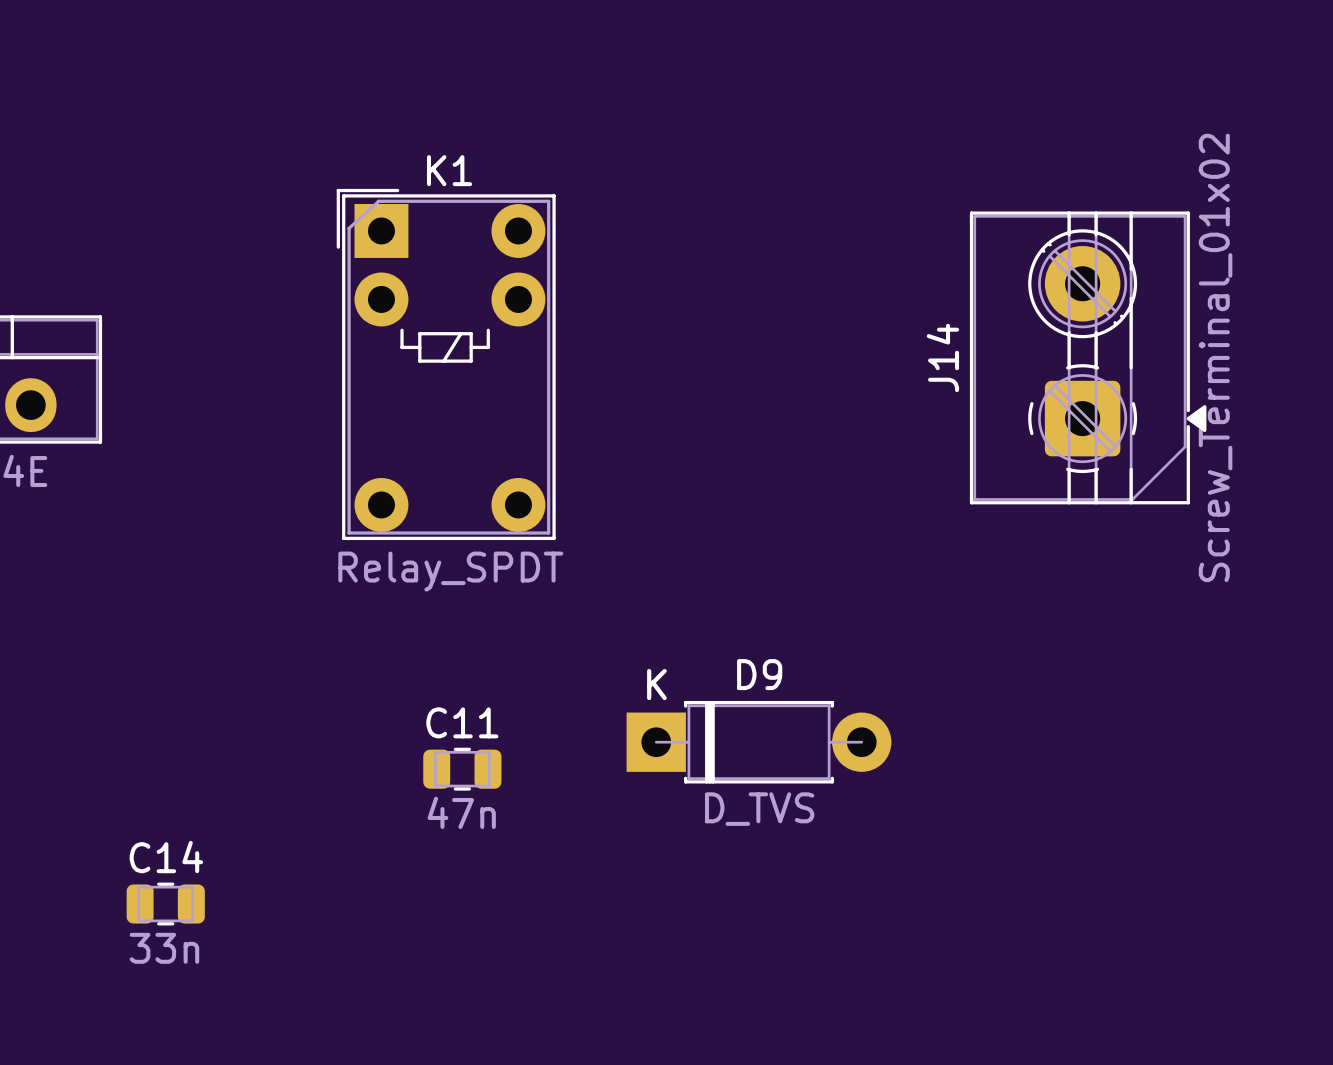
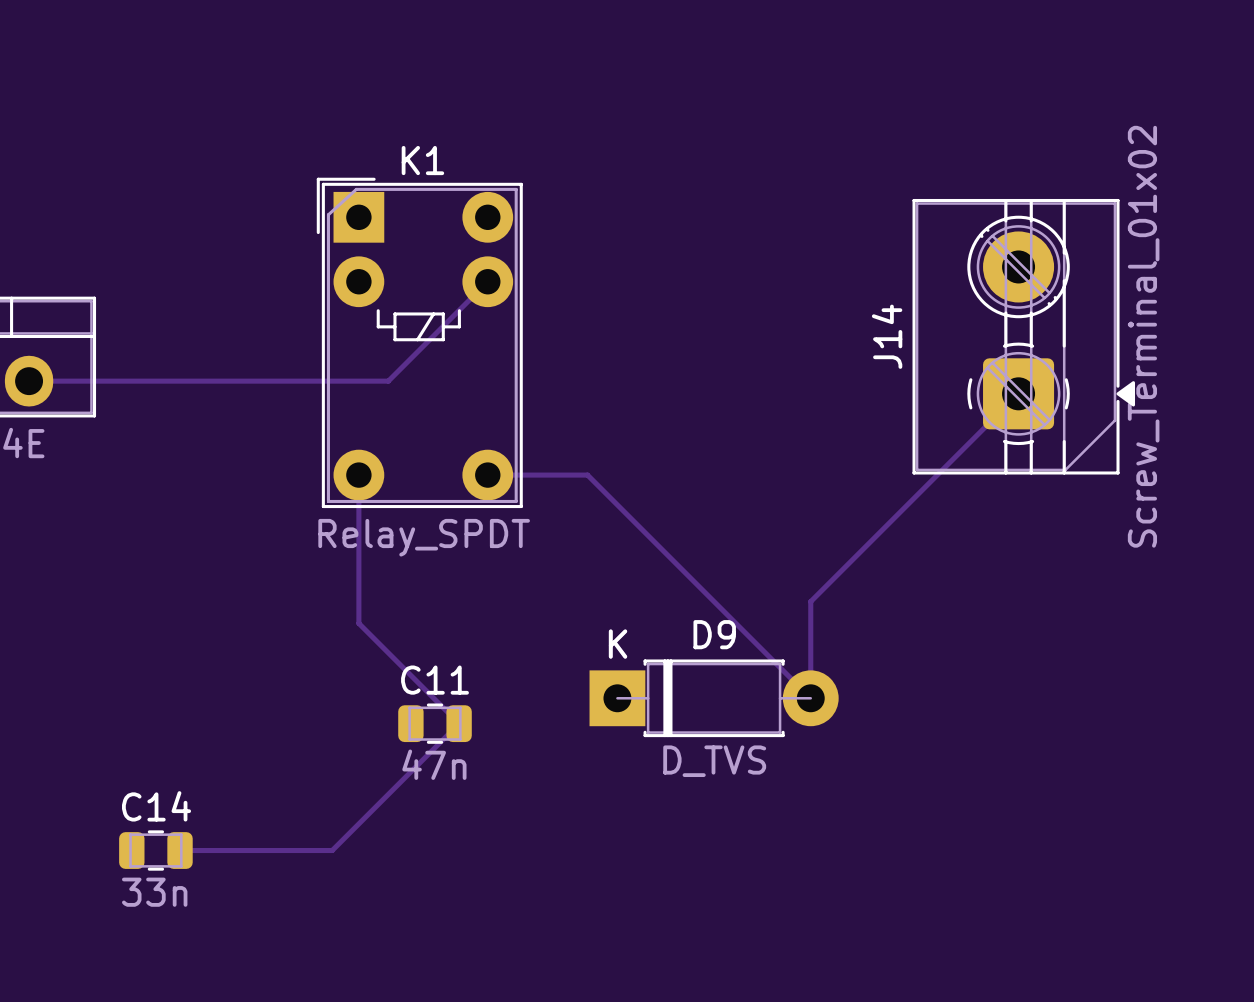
track: none -> (487, 281) (388, 381) (29, 381)
track: none -> (1018, 393) (810, 601) (810, 698) (587, 475) (487, 475)
track: none -> (358, 475) (358, 623) (459, 723) (332, 850) (180, 850)

